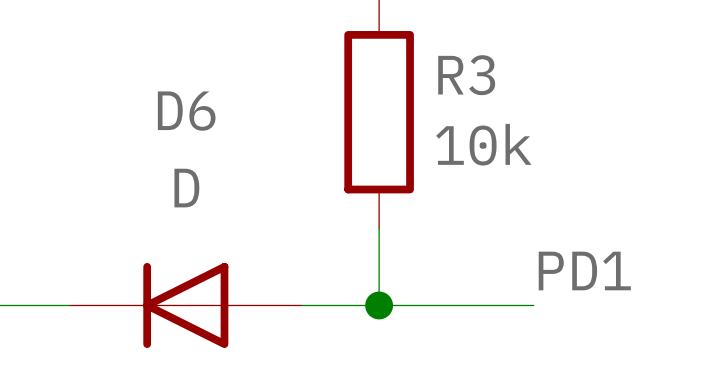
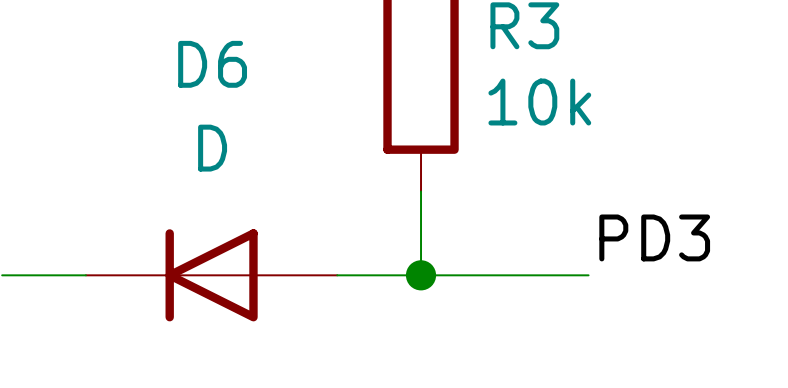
label: PD1 (584, 270) -> PD3 (654, 237)

